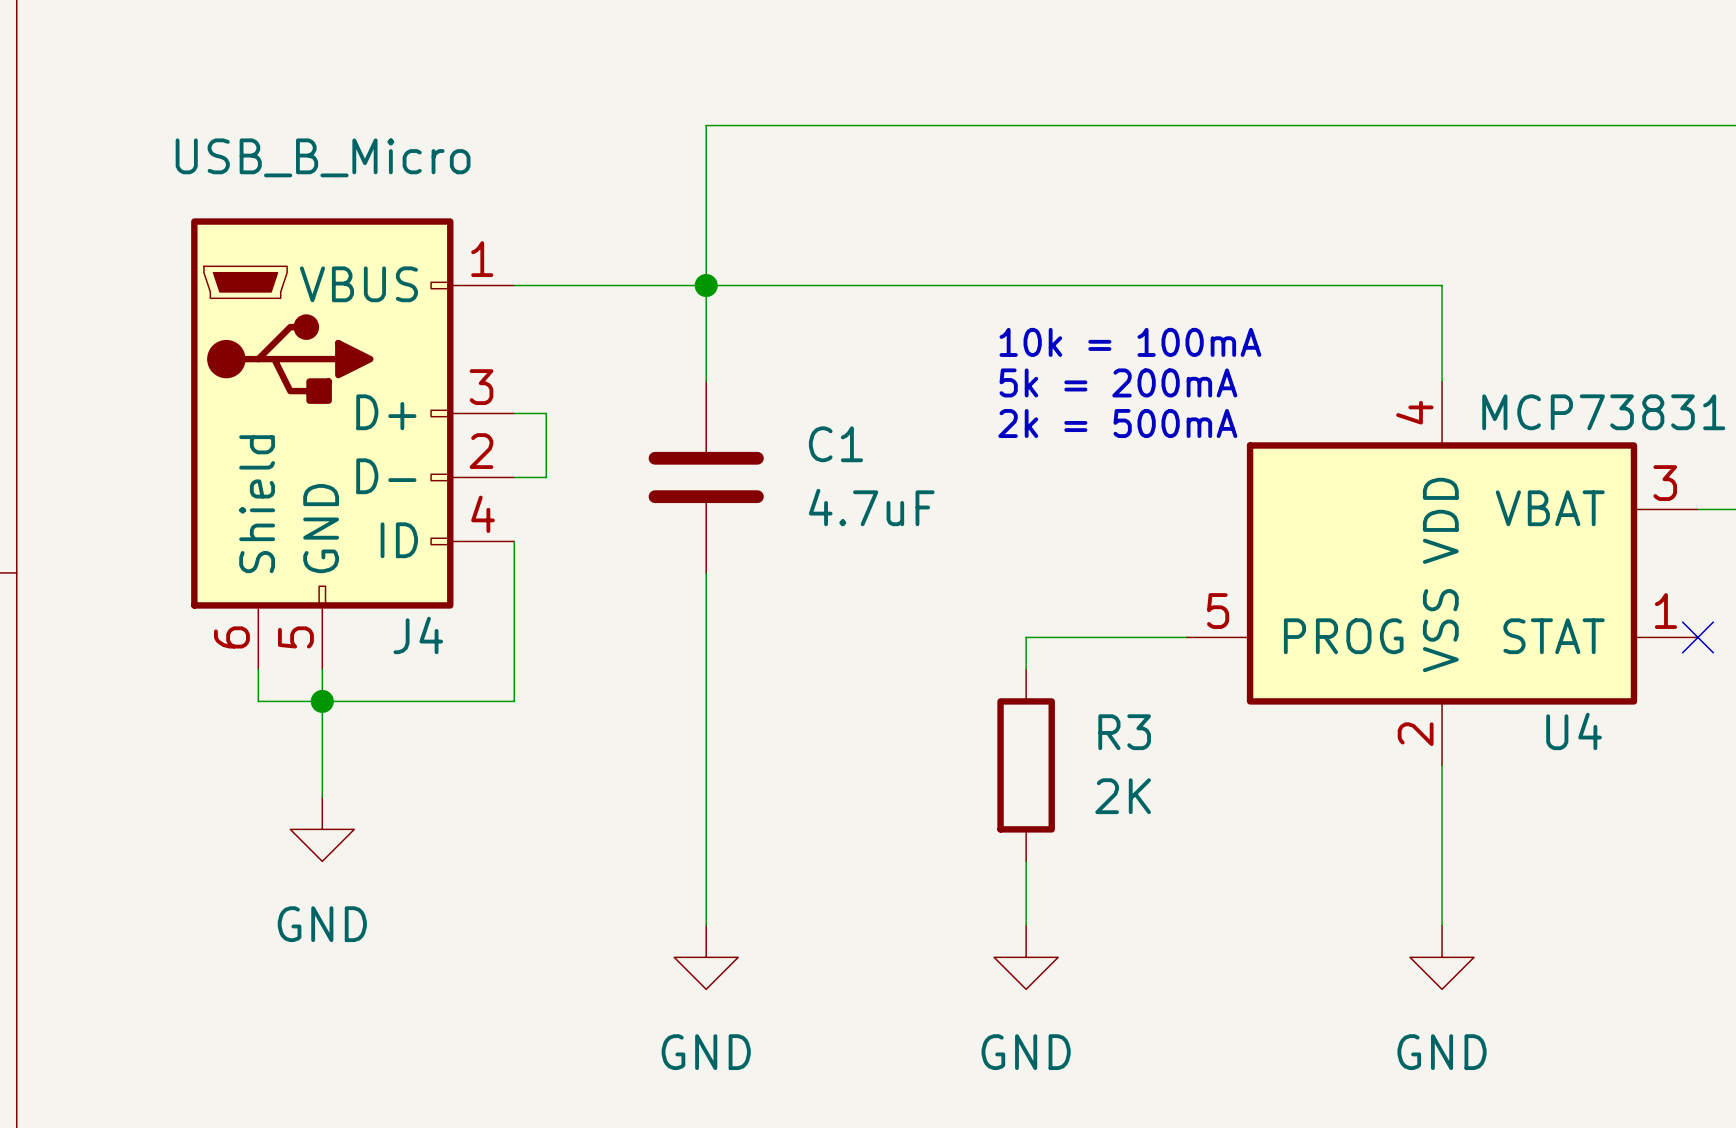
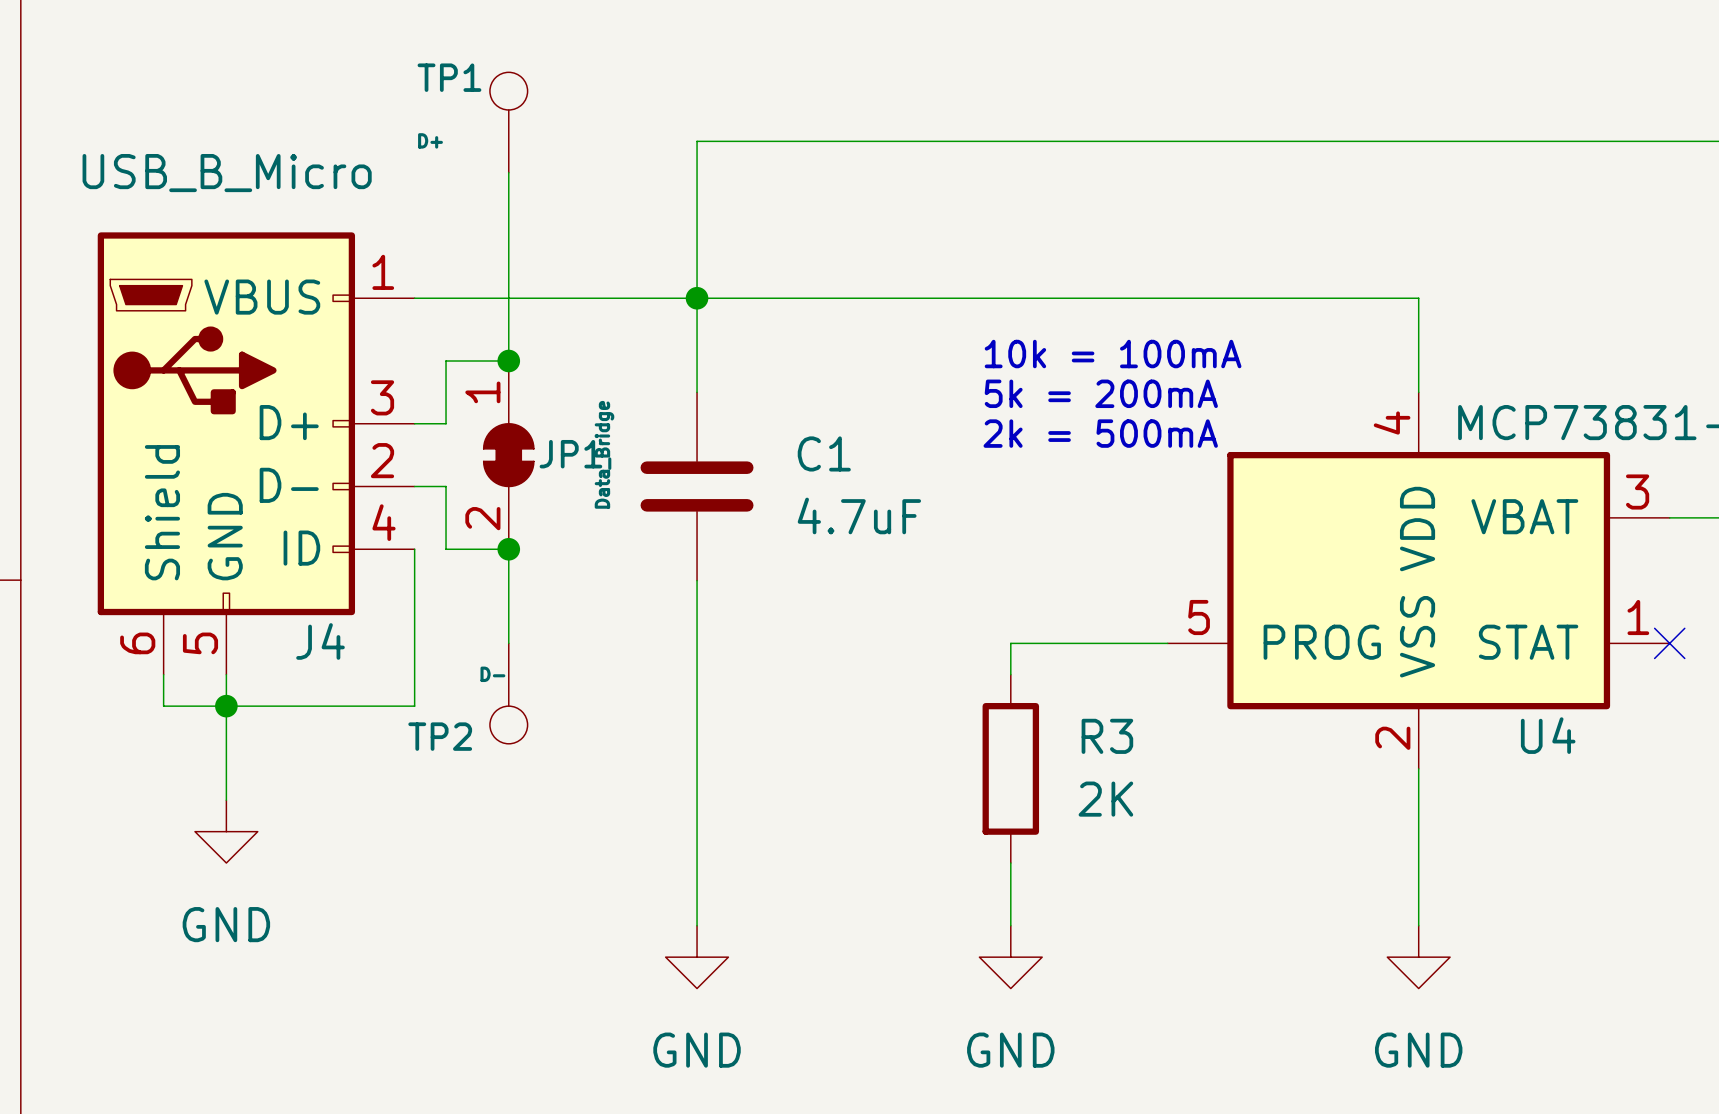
TP1: none -> D+ (508, 122)
wire: none -> (508, 172) (508, 361) (446, 361) (446, 423) (414, 423)
junction: none -> (508, 361)
wire: (514, 413) (546, 413) (546, 477) (514, 477) -> none
J4 position: (352, 443) -> (256, 453)
JP1: none -> Data_Bridge (508, 455)
junction: none -> (508, 549)
wire: (514, 637) (514, 701) (418, 701) -> (414, 549) (414, 706)
wire: (258, 669) (258, 701) -> (163, 674) (163, 706) (257, 706)
wire: (322, 669) (322, 797) -> (226, 674) (226, 800)
TP2: none -> D- (508, 693)
junction position: (322, 701) -> (226, 706)
power symbol position: GND (322, 829) -> GND (226, 831)

